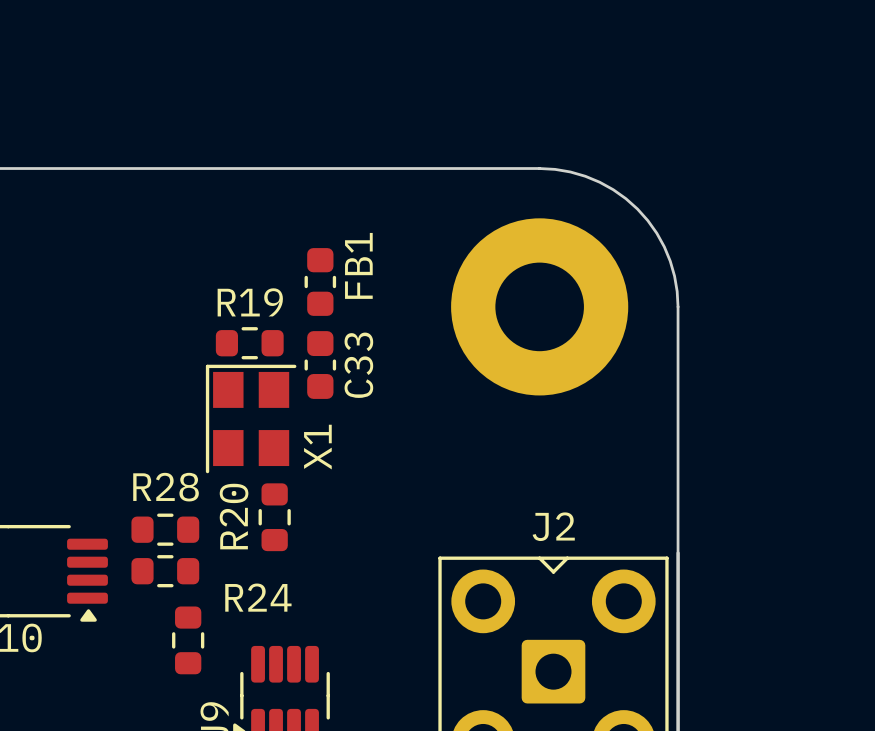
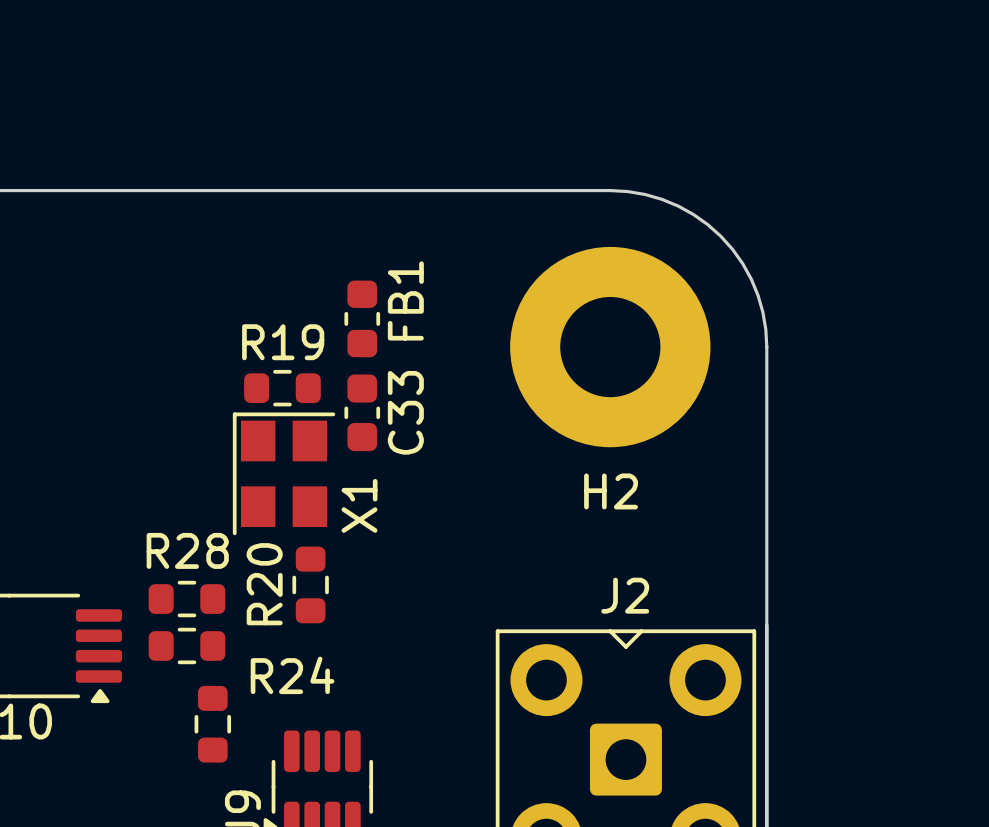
H2 name: none -> H2 (611, 491)

